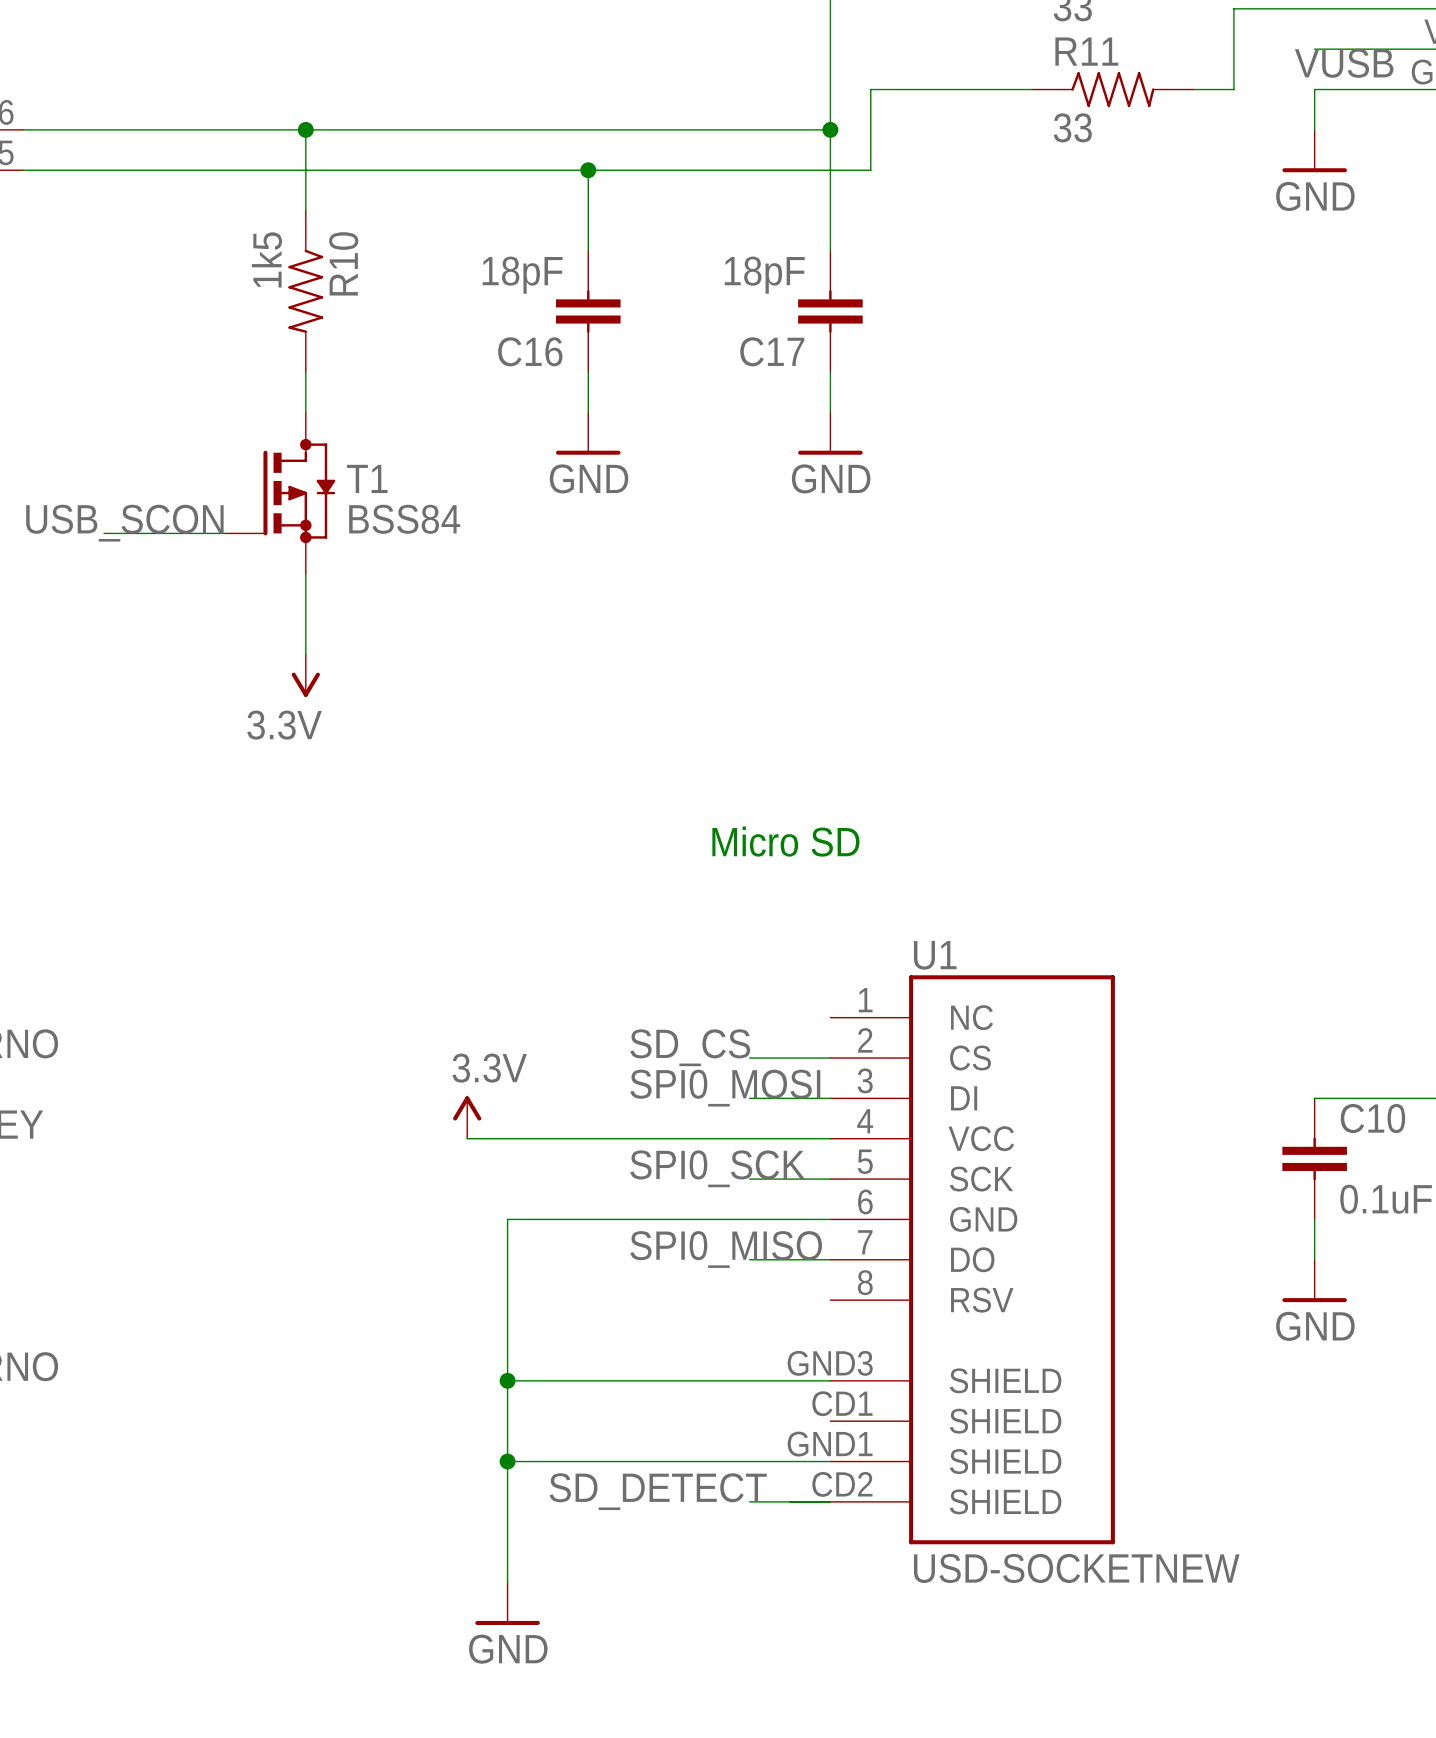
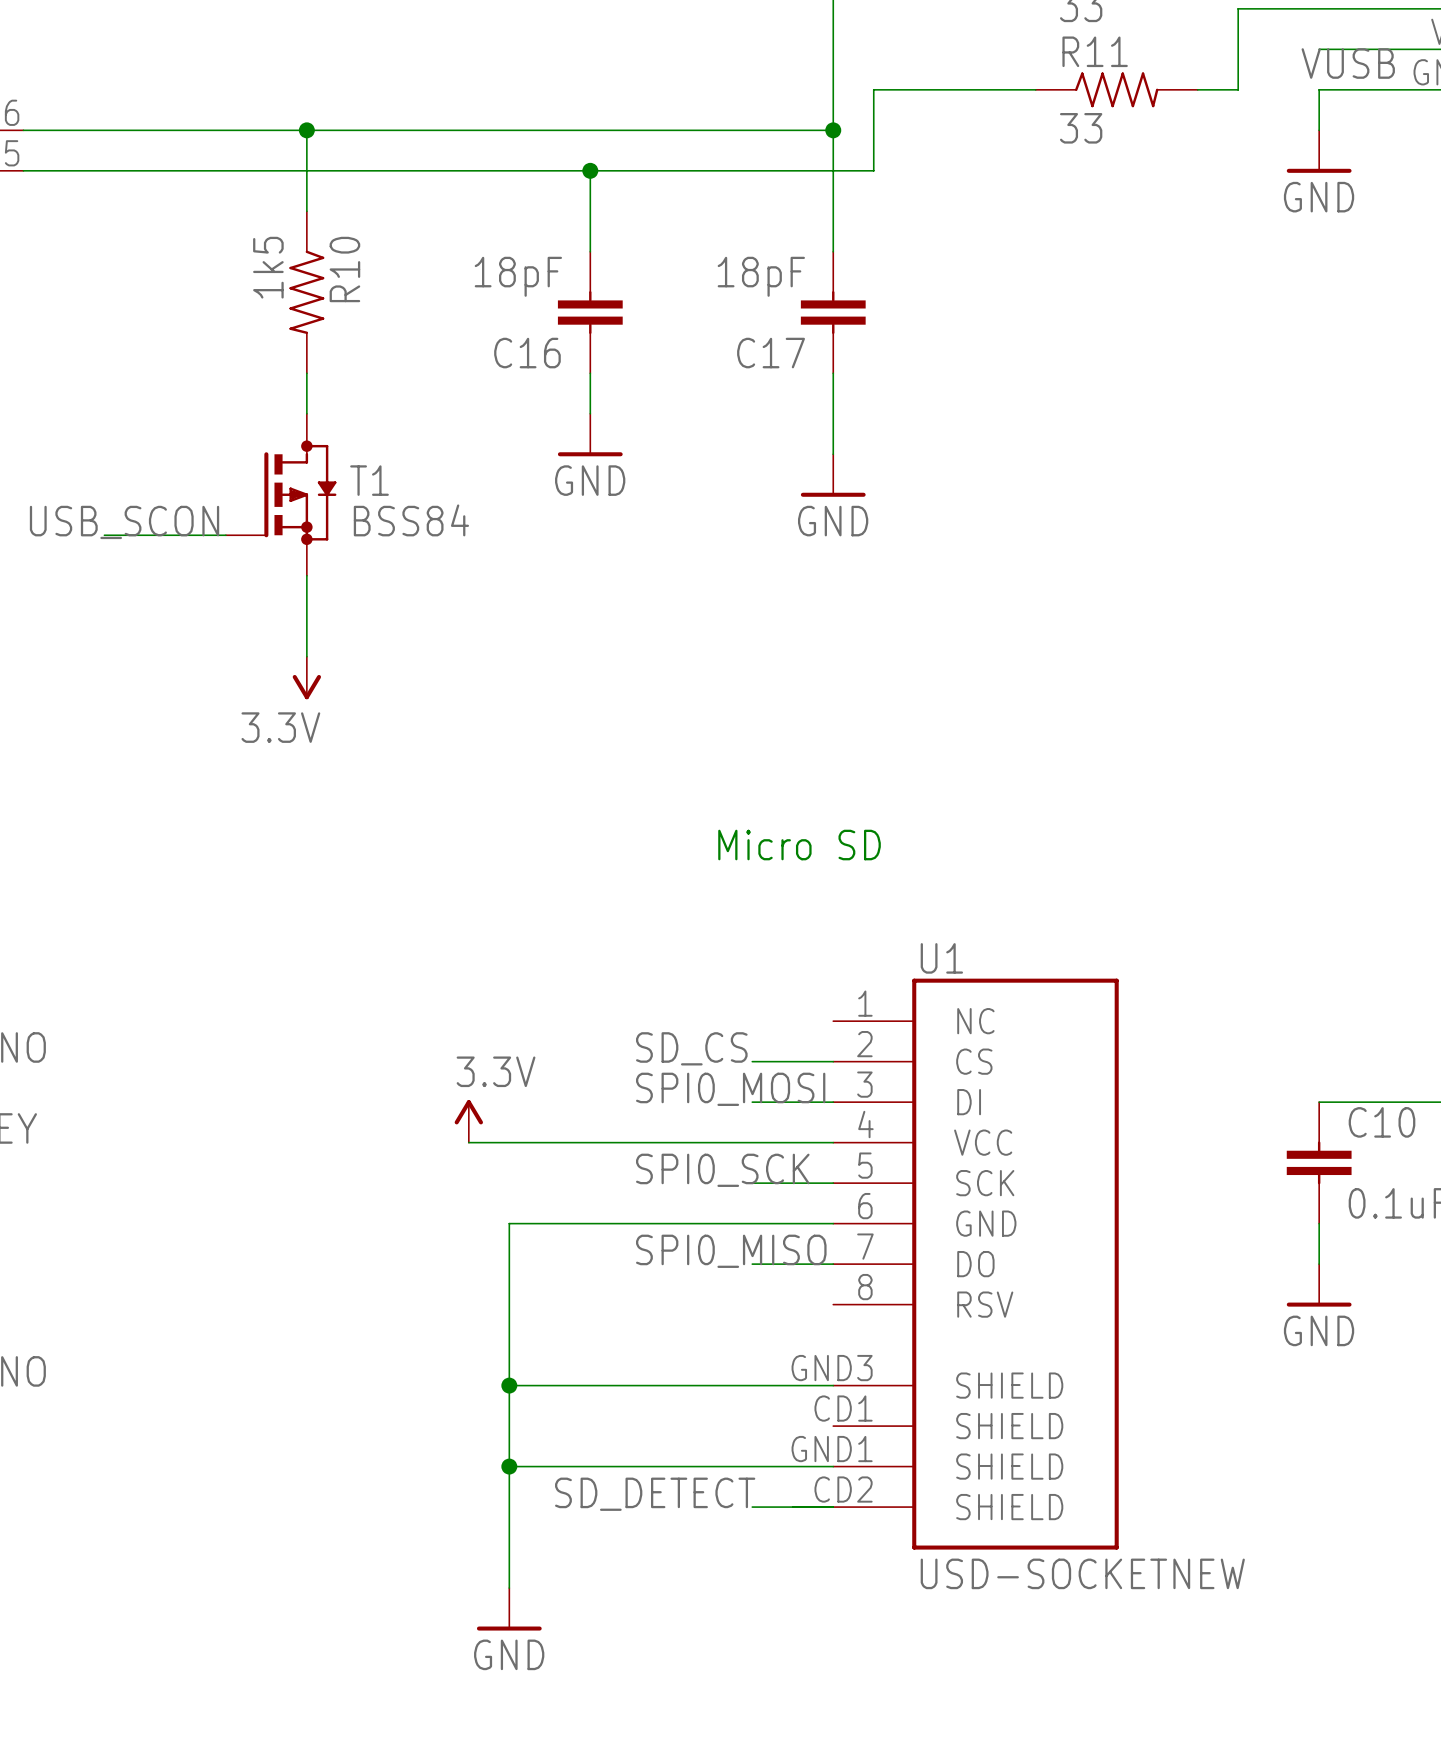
power symbol position: GND (830, 433) -> GND (833, 475)

